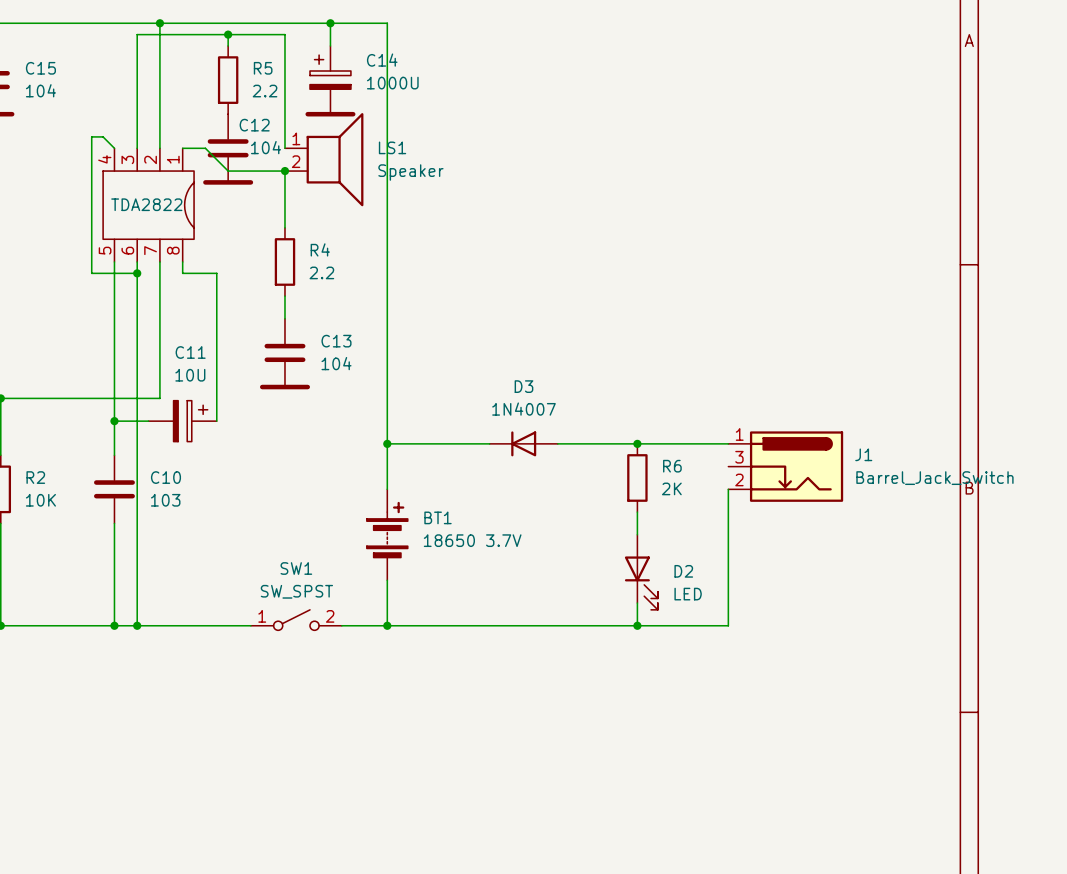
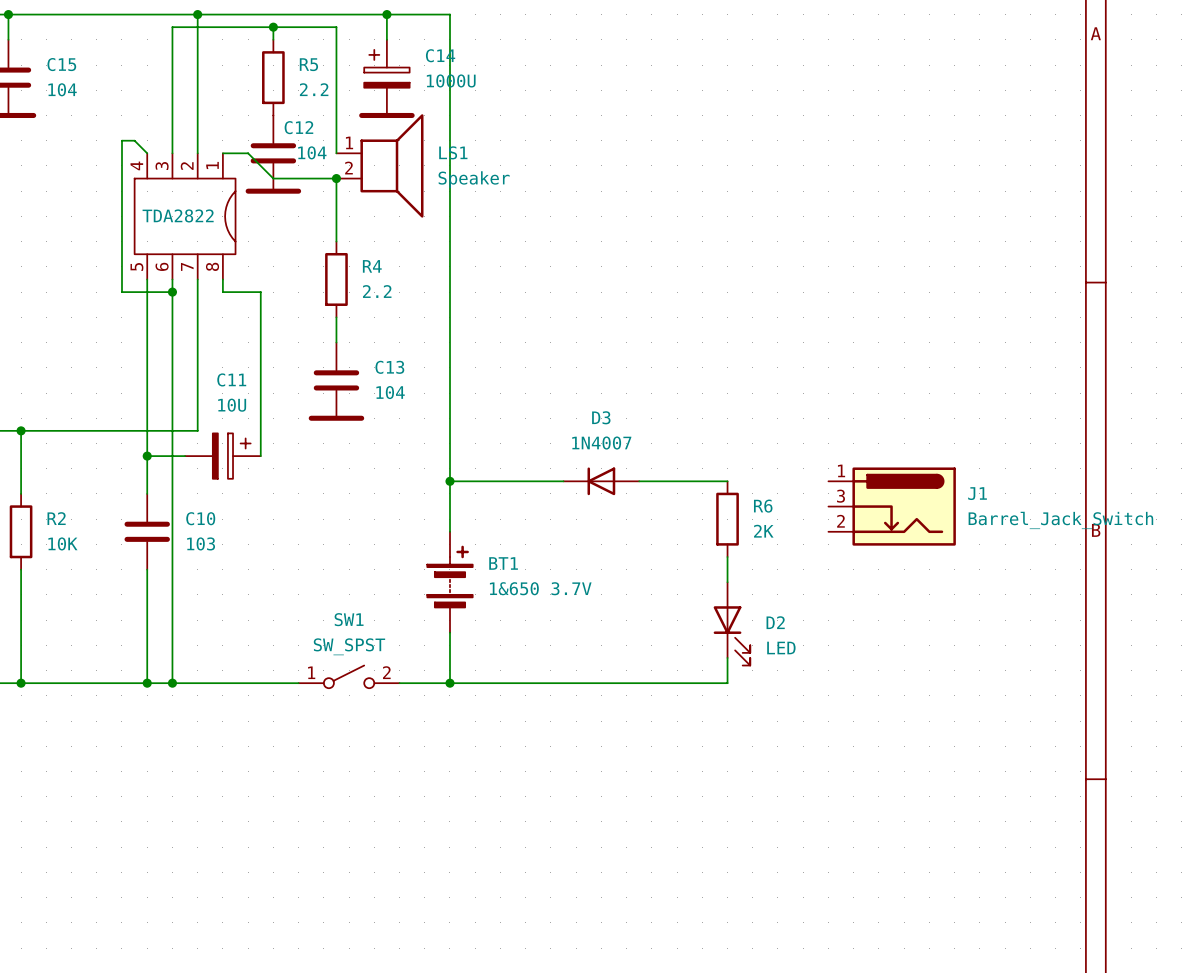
wire: (637, 443) (728, 443) -> none
junction: (637, 443) -> none
wire: (728, 489) (728, 625) (637, 625) -> none
BT1 value: 18650 3.7V (472, 540) -> 1&650 3.7V (540, 588)
junction: (637, 625) -> none

